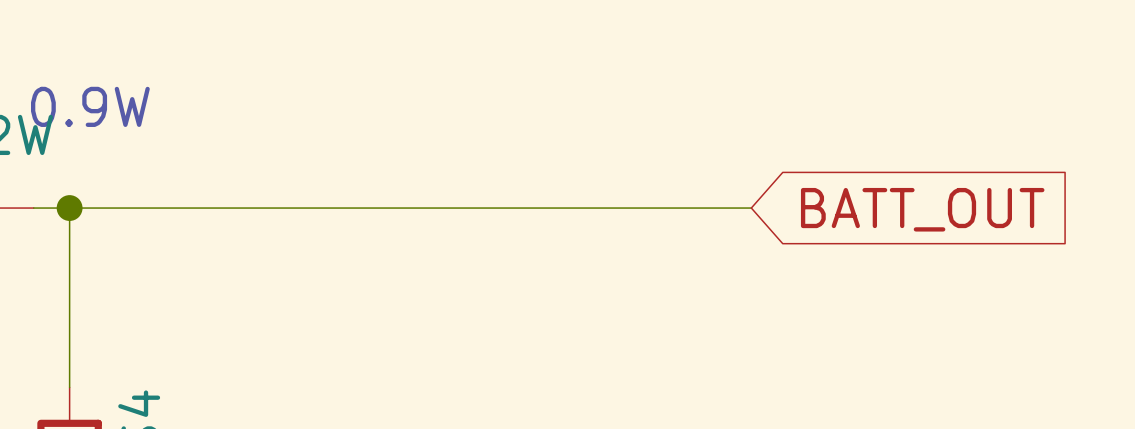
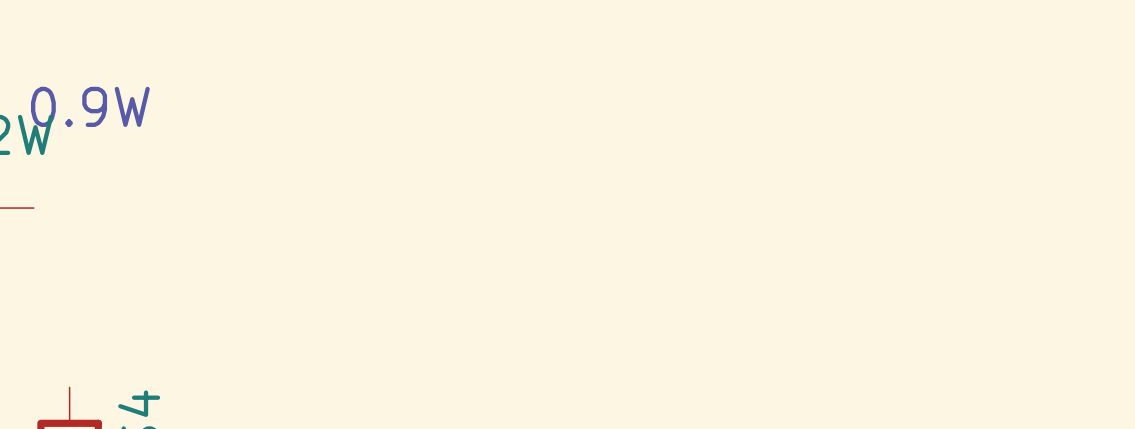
wire: (33, 208) (751, 208) -> none
wire: (69, 208) (69, 387) -> none
junction: (69, 208) -> none
global label: BATT_OUT (922, 209) -> none

